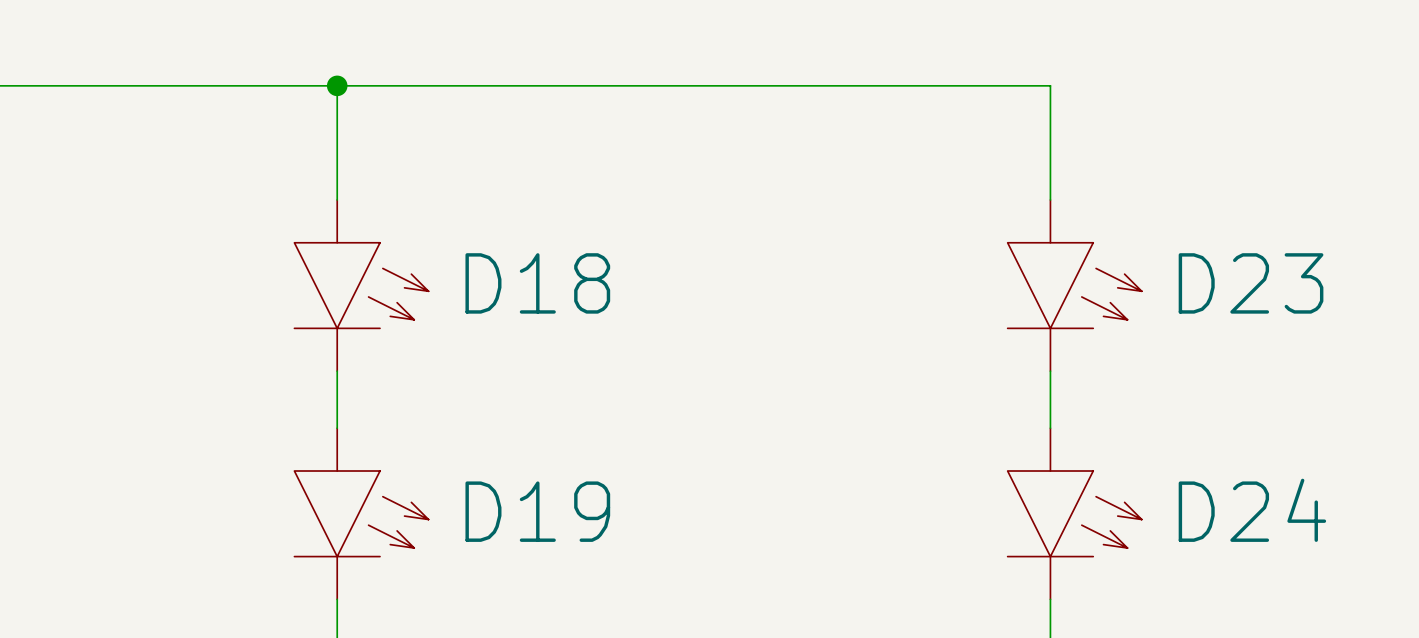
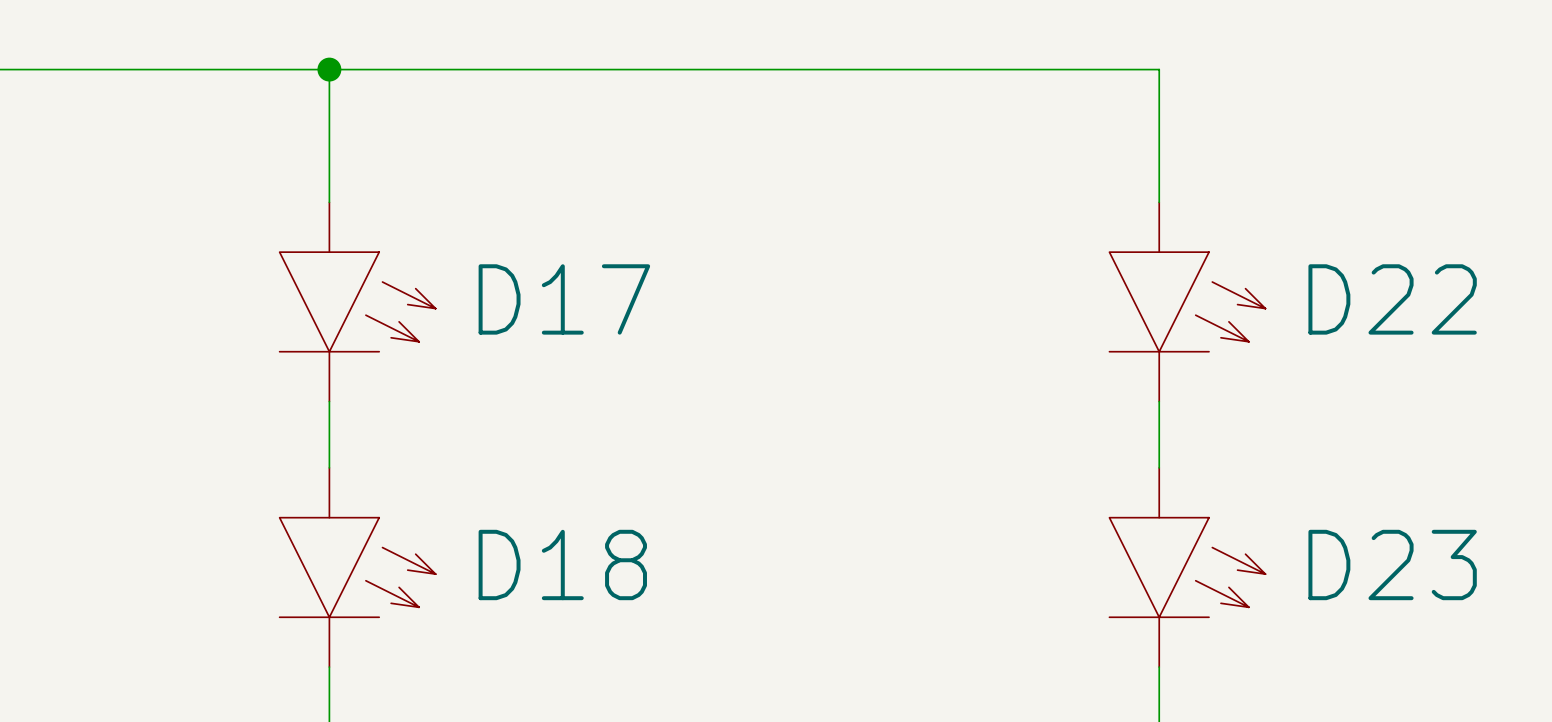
D18 name: D18 (537, 283) -> D17 (564, 299)
D23 name: D23 (1251, 283) -> D22 (1392, 299)
D24 name: D24 (1252, 510) -> D23 (1392, 564)
D19 name: D19 (537, 511) -> D18 (562, 564)

